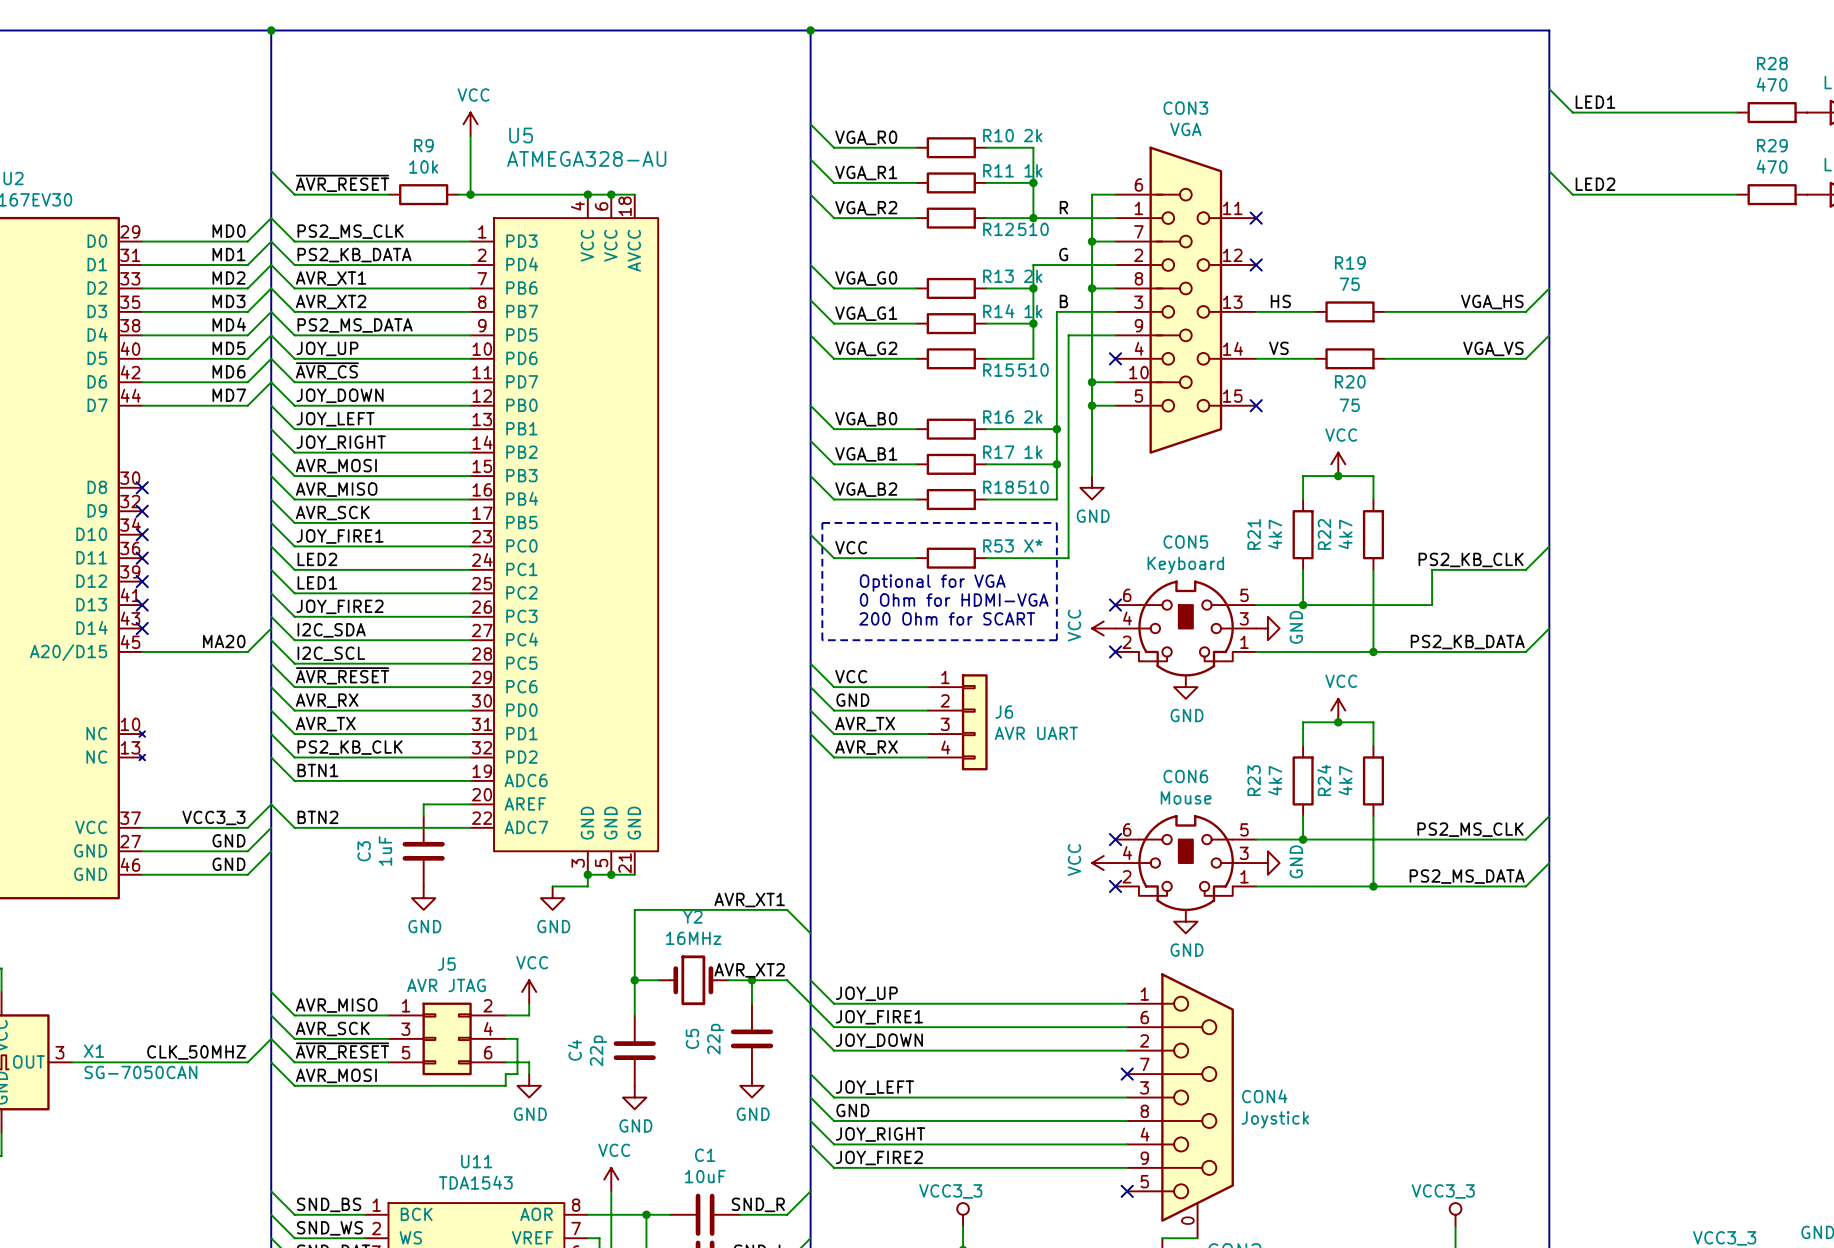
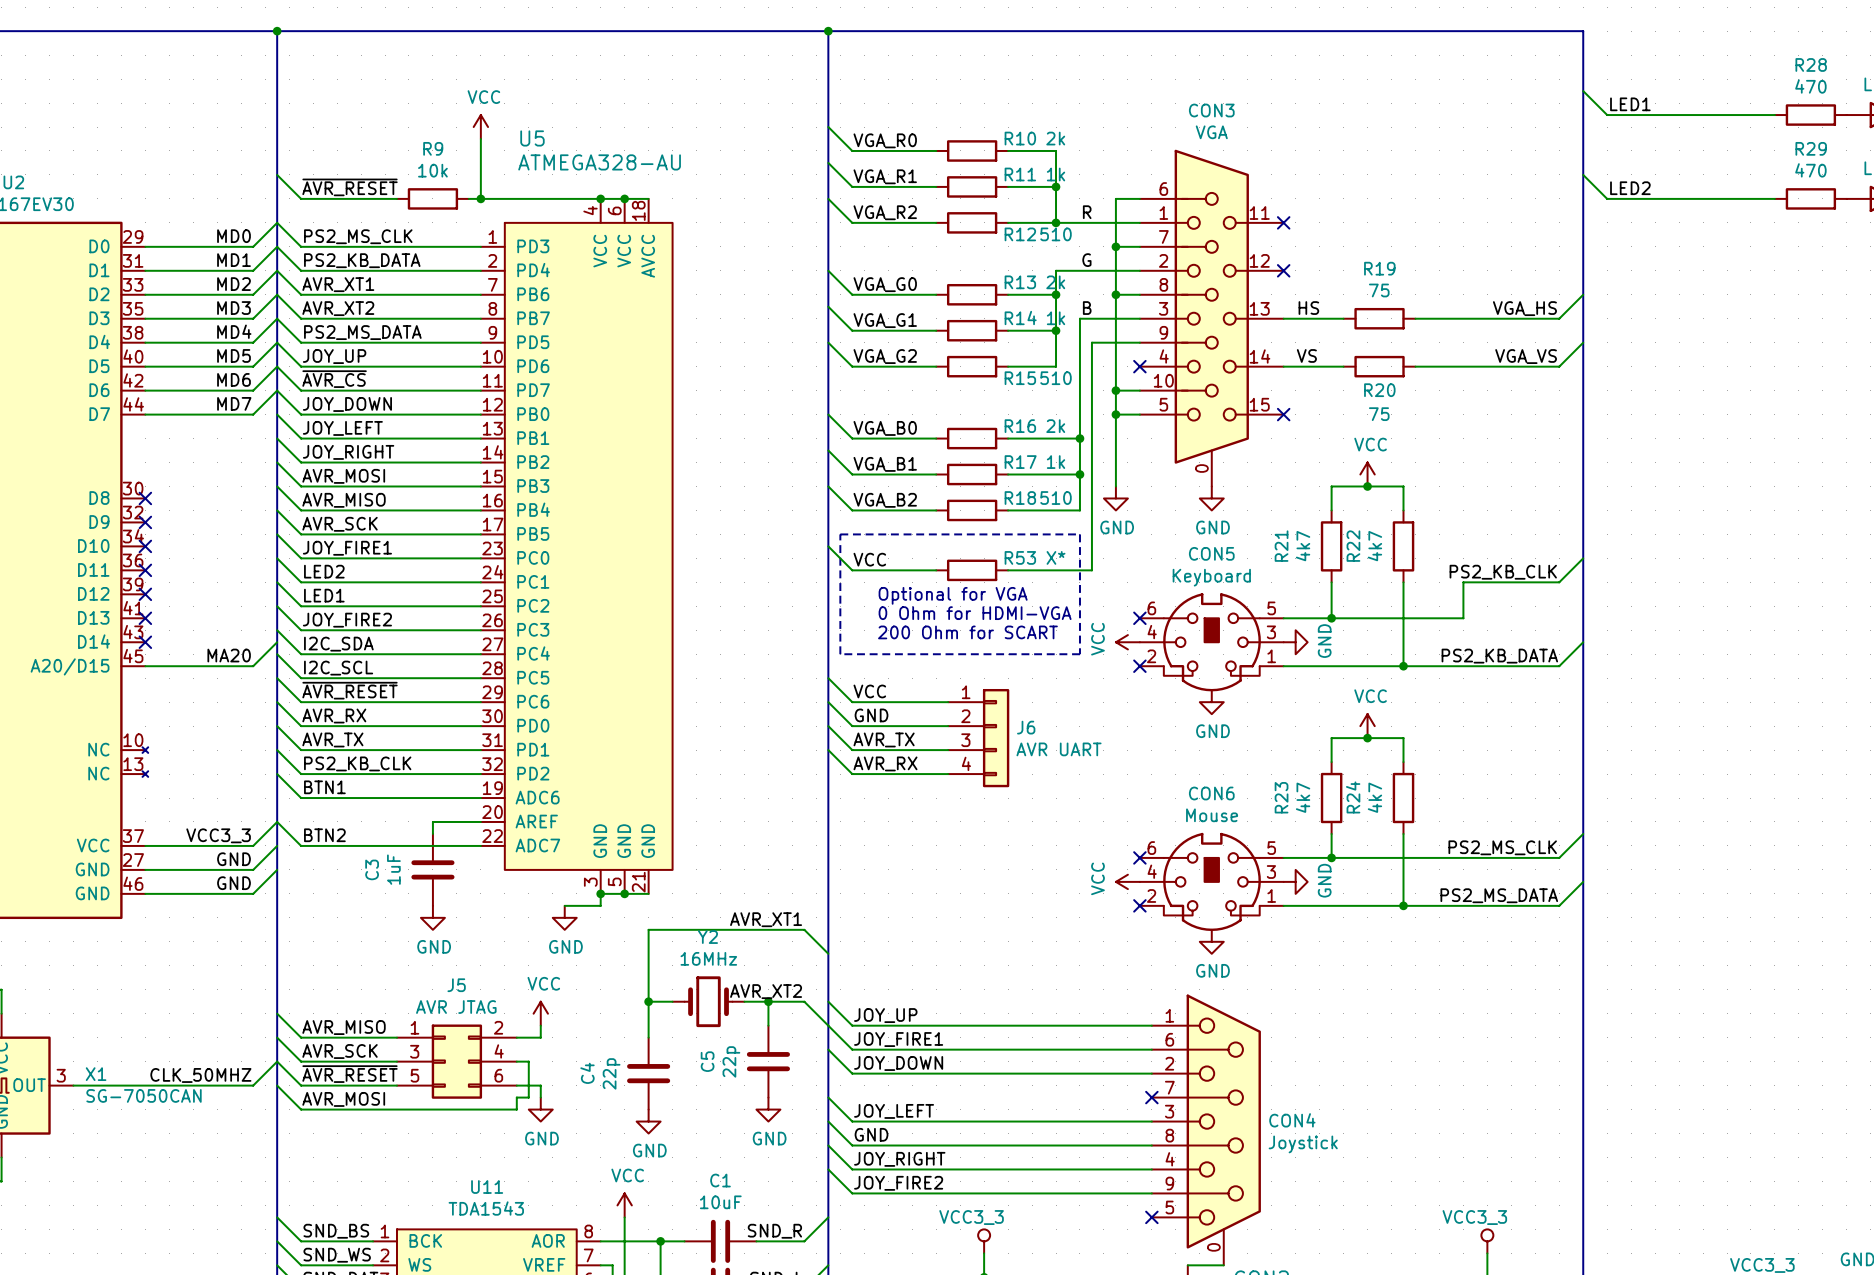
CON3 symbol: [1115, 146, 1257, 454] -> [1139, 149, 1284, 487]
power symbol: none -> GND (1211, 498)

